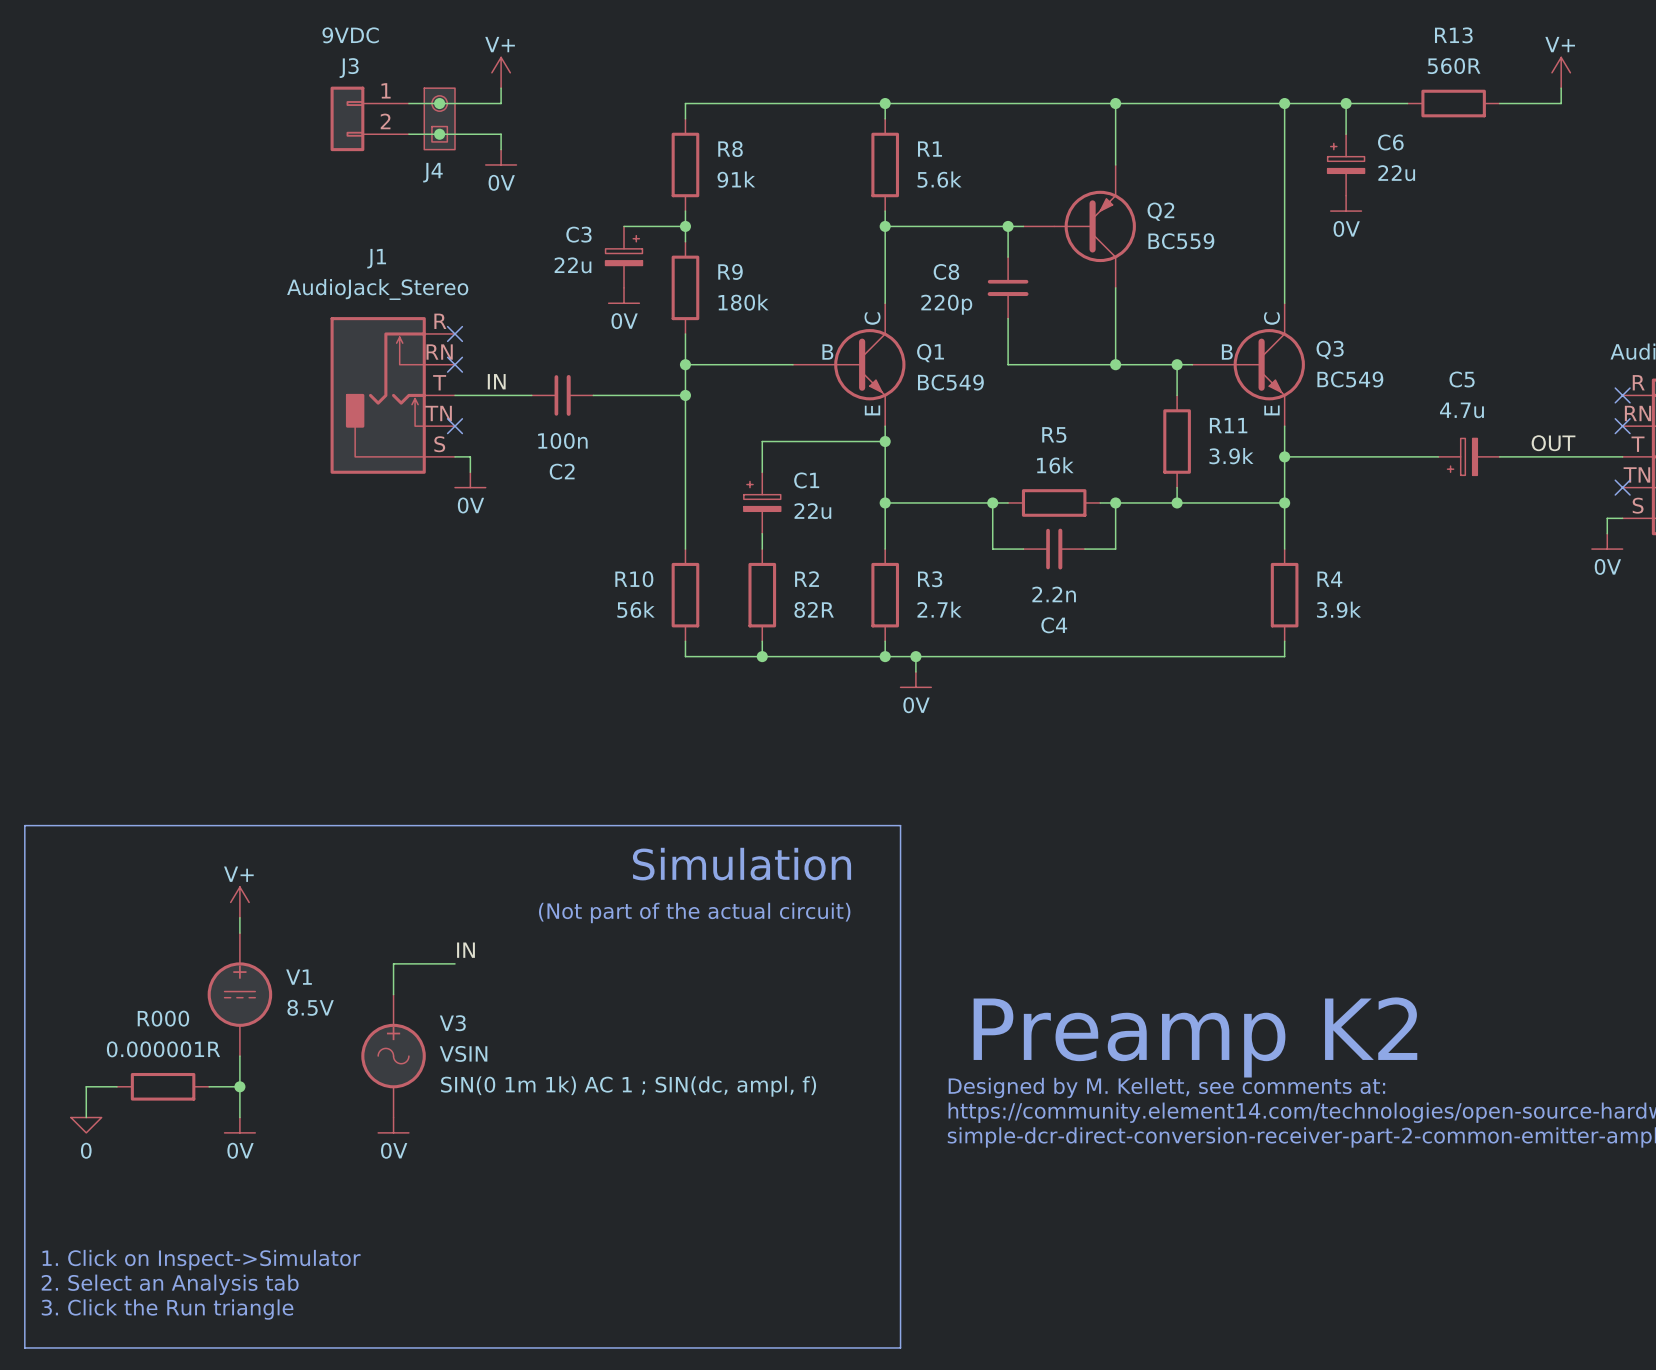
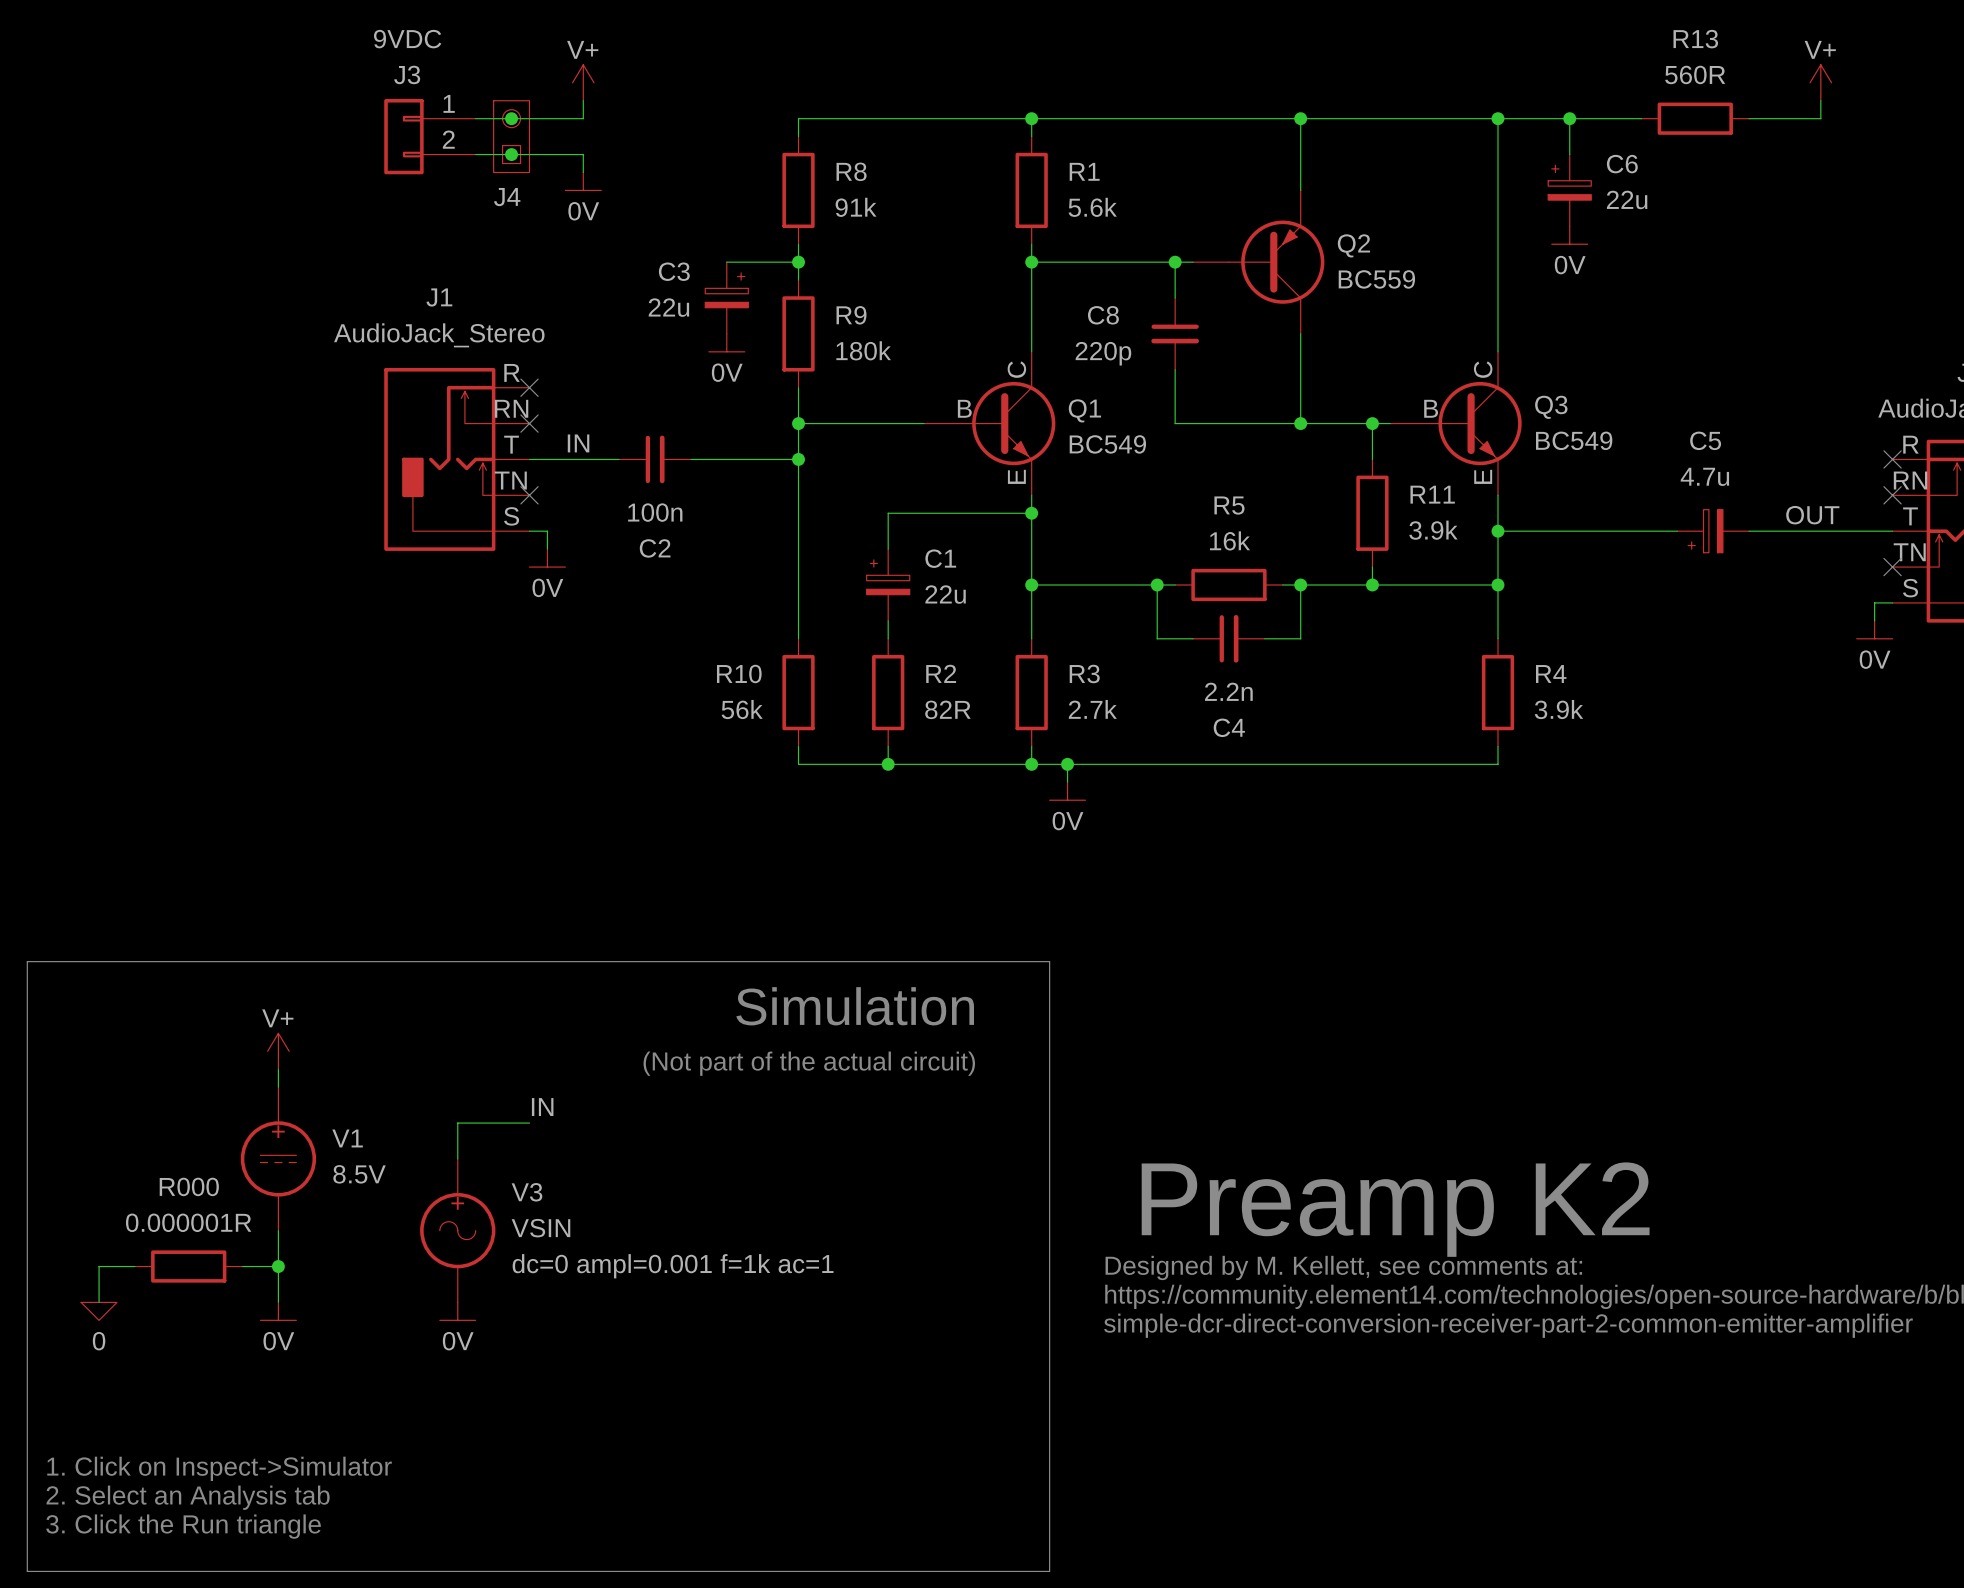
V3 text: SIN(0 1m 1k) AC 1 ; SIN(dc, ampl, f) (628, 1086) -> dc=0 ampl=0.001 f=1k ac=1 (673, 1266)

